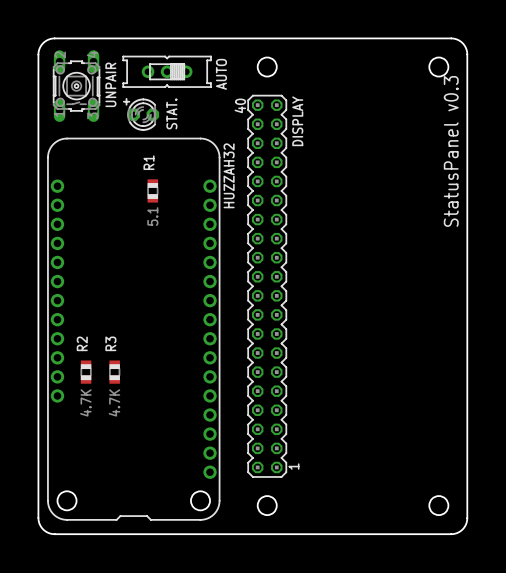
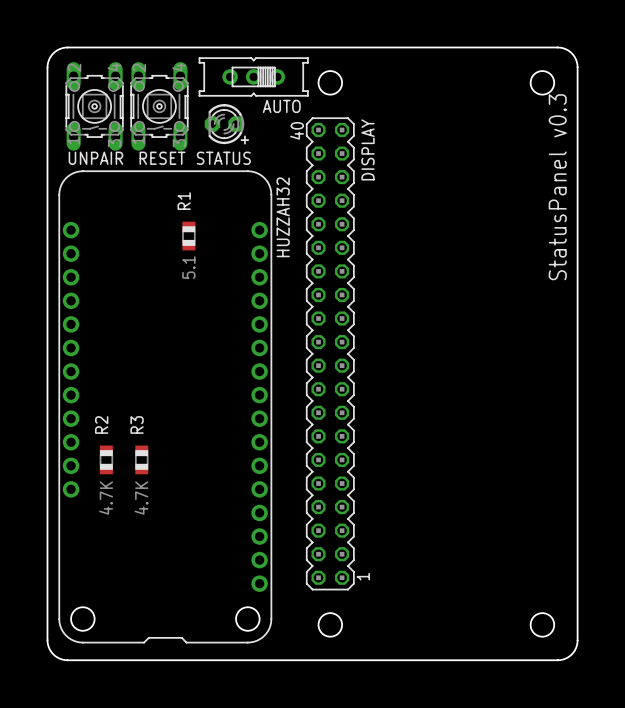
AUTO position: (167, 71) -> (253, 76)
AUTO name rotation: 0° (221, 74) -> 90° clockwise (281, 106)
UNPAIR name rotation: 0° (110, 84) -> 90° clockwise (95, 158)
UNPAIR name position: UNPAIR (110, 84) -> UNPAIR (95, 158)
RESET: none -> (159, 106)
STATUS: none -> (226, 124)
STAT.: (141, 114) -> none

